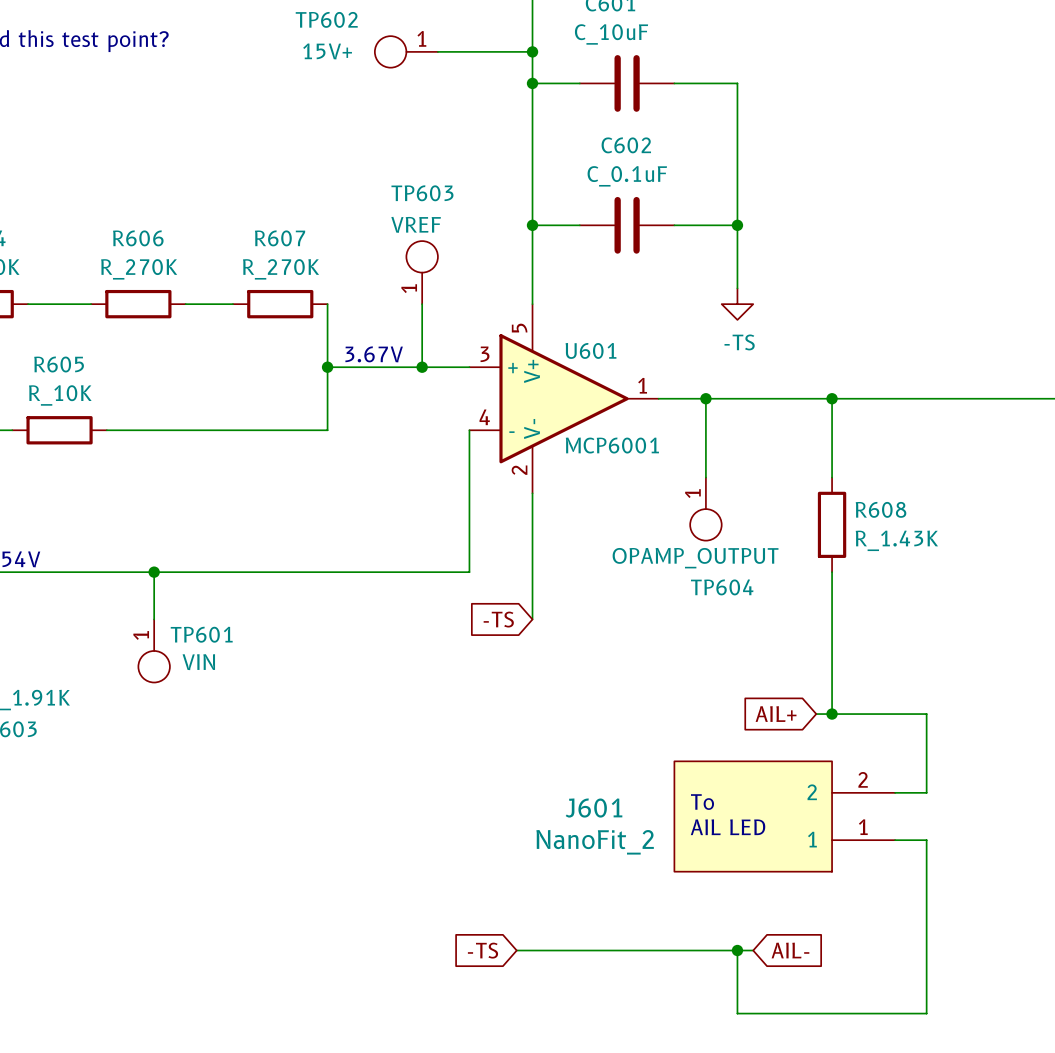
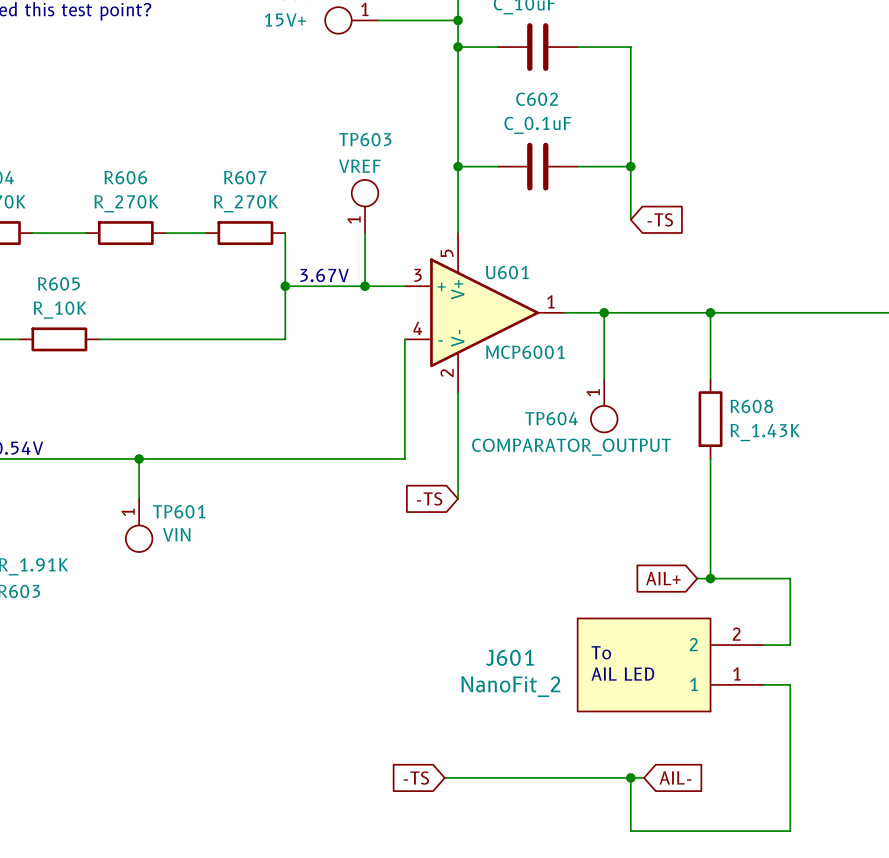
global label: none -> -TS (660, 219)
power symbol: -TS (737, 304) -> none
TP604 value: OPAMP_OUTPUT (695, 558) -> COMPARATOR_OUTPUT (571, 447)
TP604 name position: TP604 (722, 587) -> TP604 (551, 418)

